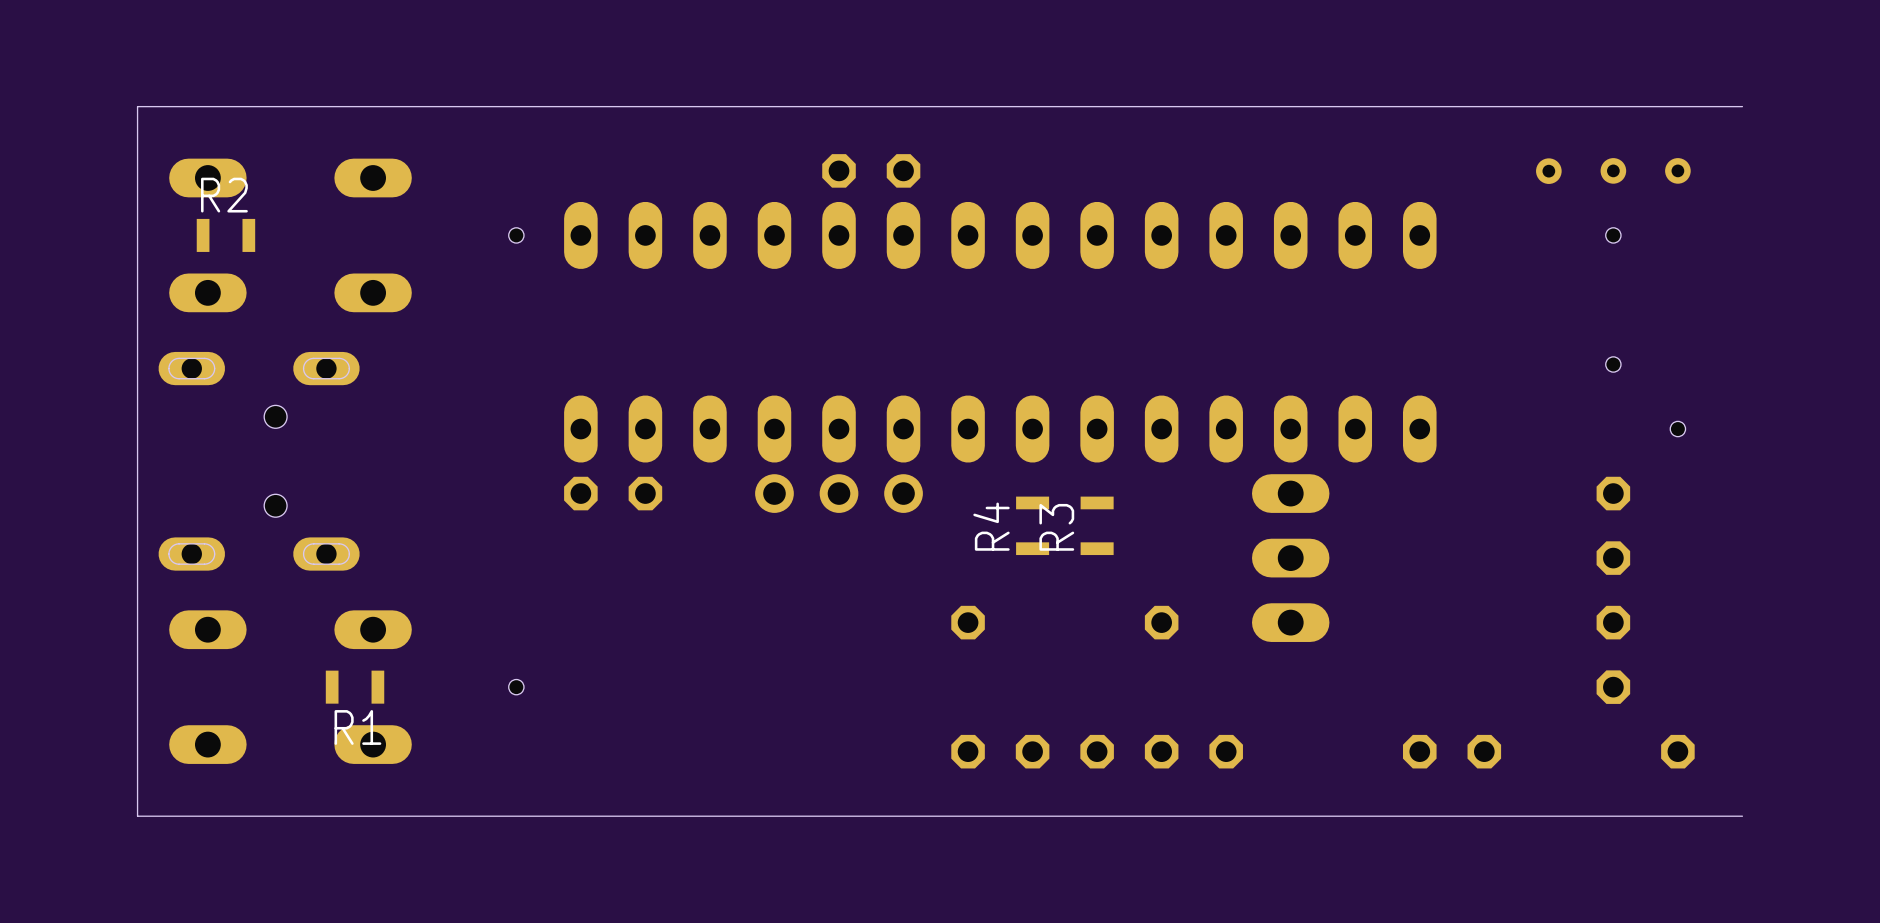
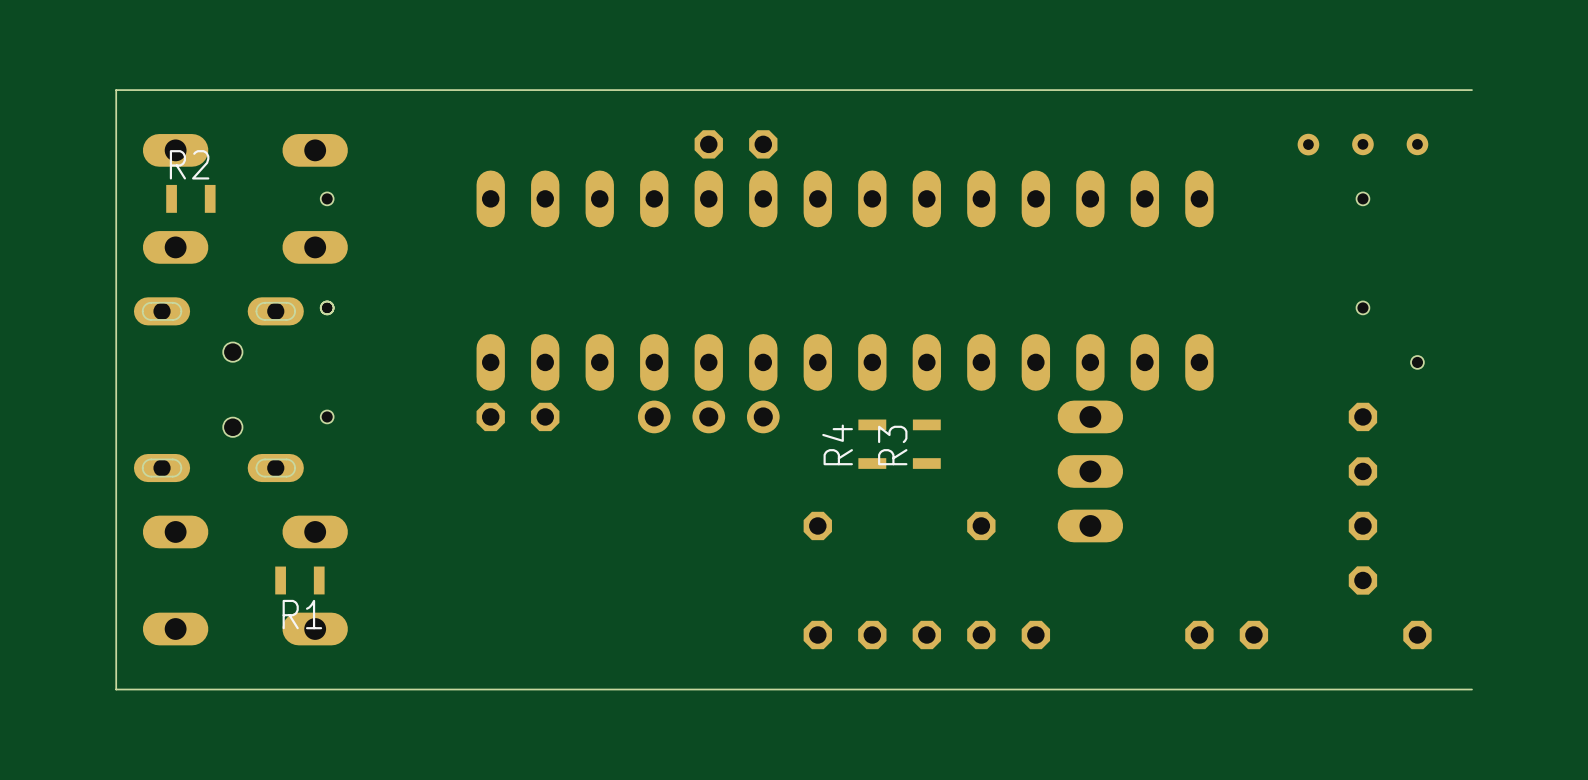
hole: none -> (327, 198)
hole: (516, 235) -> none
hole: none -> (327, 307)
hole: none -> (327, 416)
hole: (516, 687) -> none

